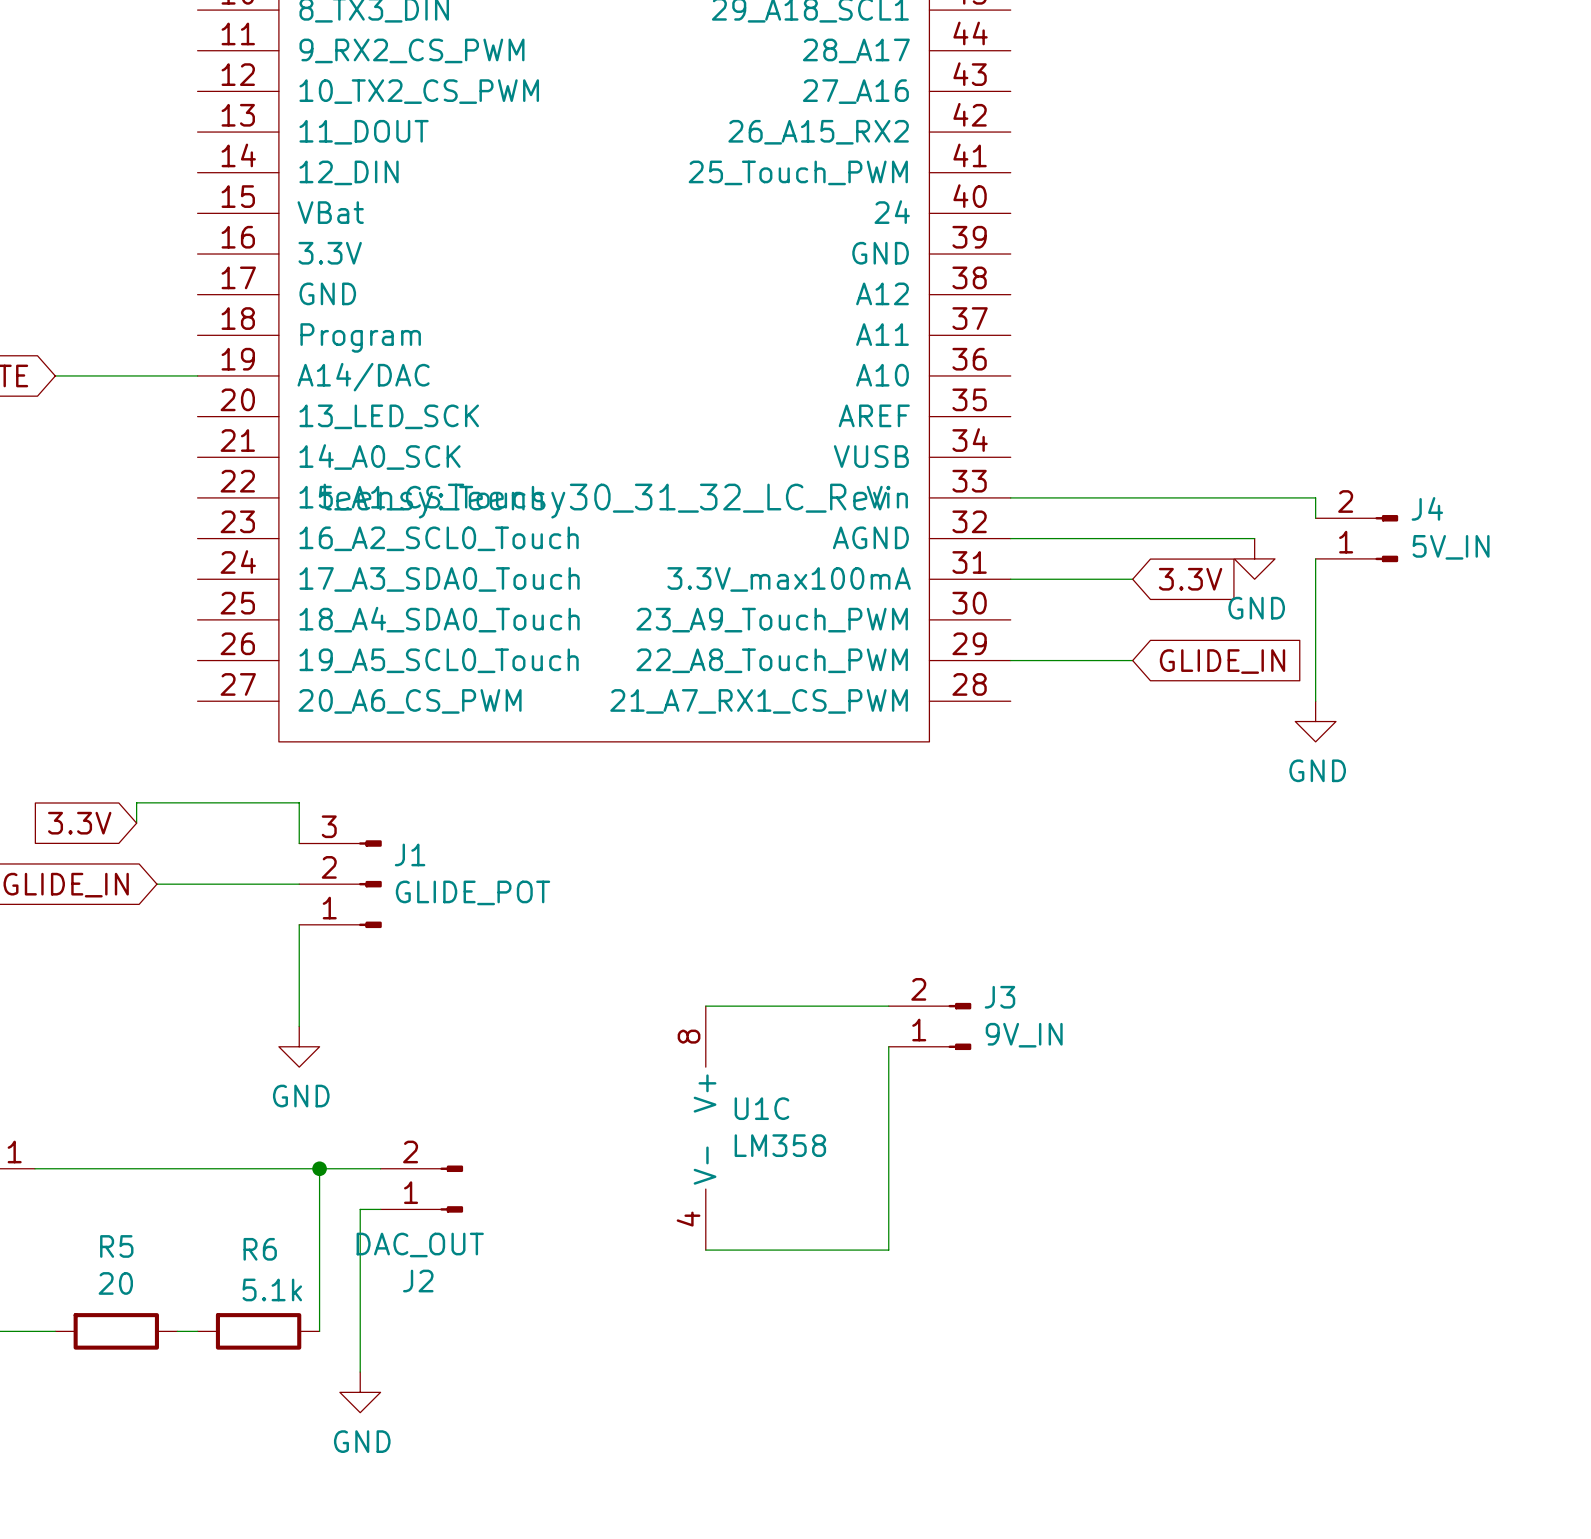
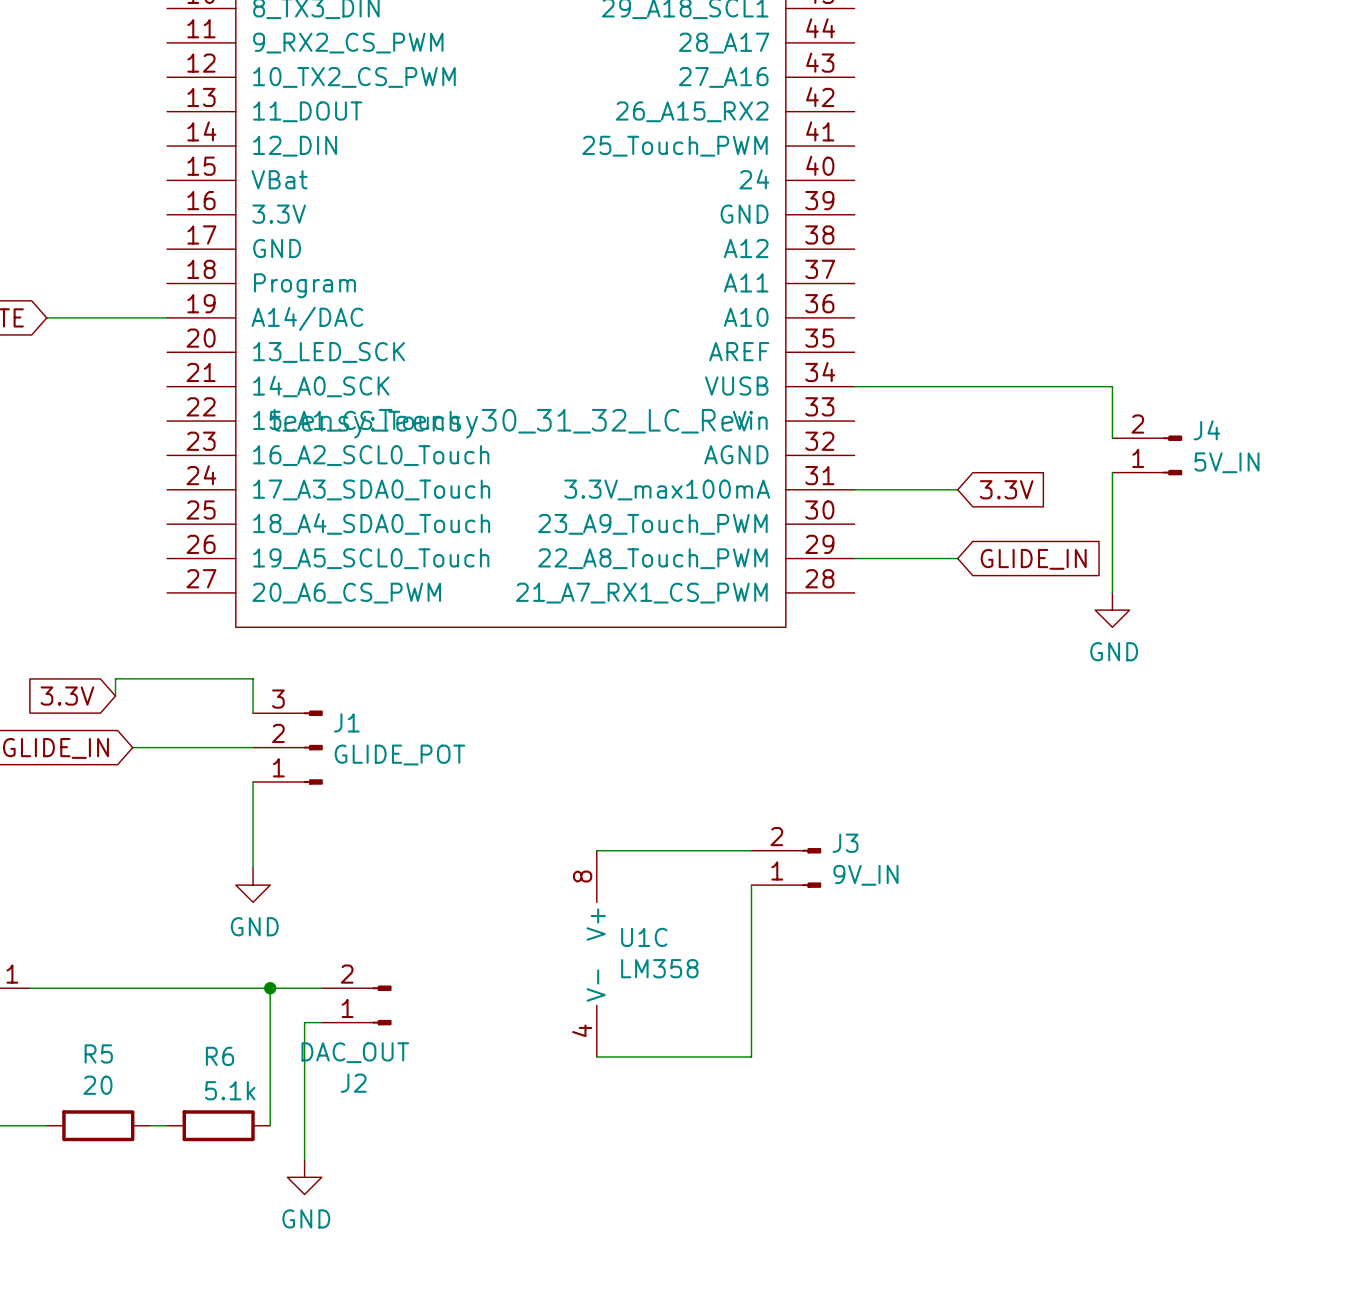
wire: (1010, 497) (1315, 497) -> (854, 386) (1112, 386) (1112, 421)
wire: (1010, 538) (1254, 538) -> none
power symbol: GND (1254, 558) -> none

